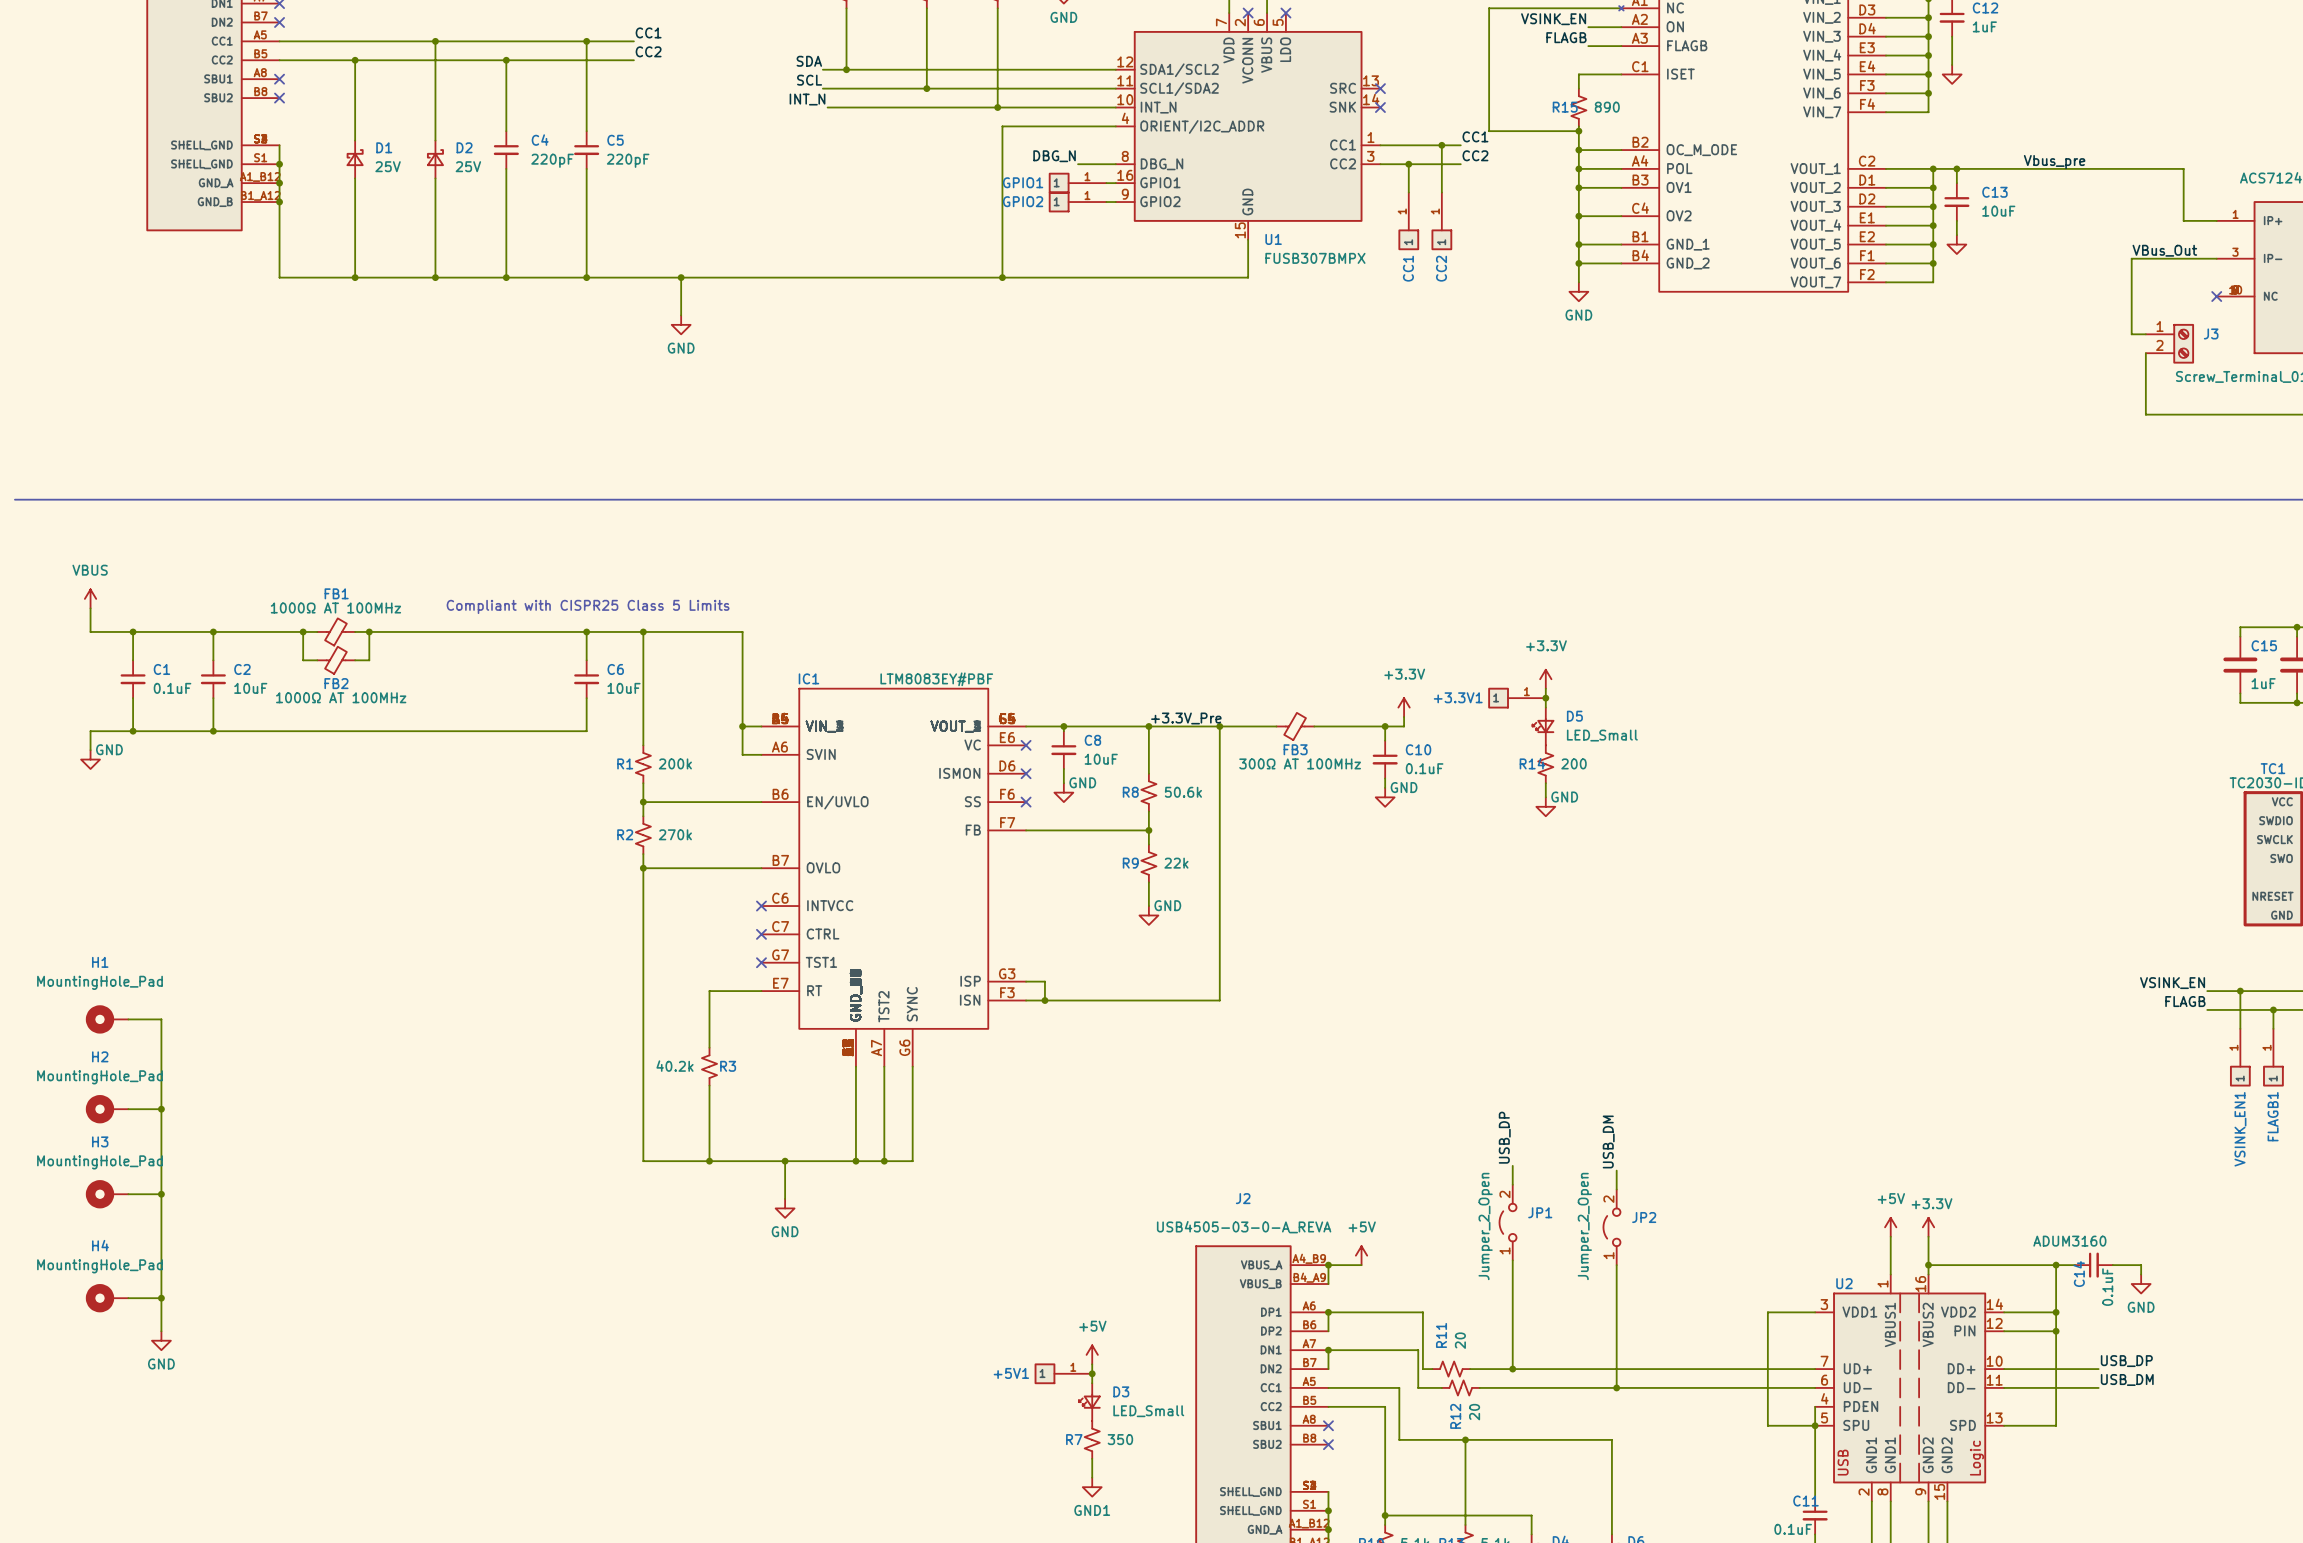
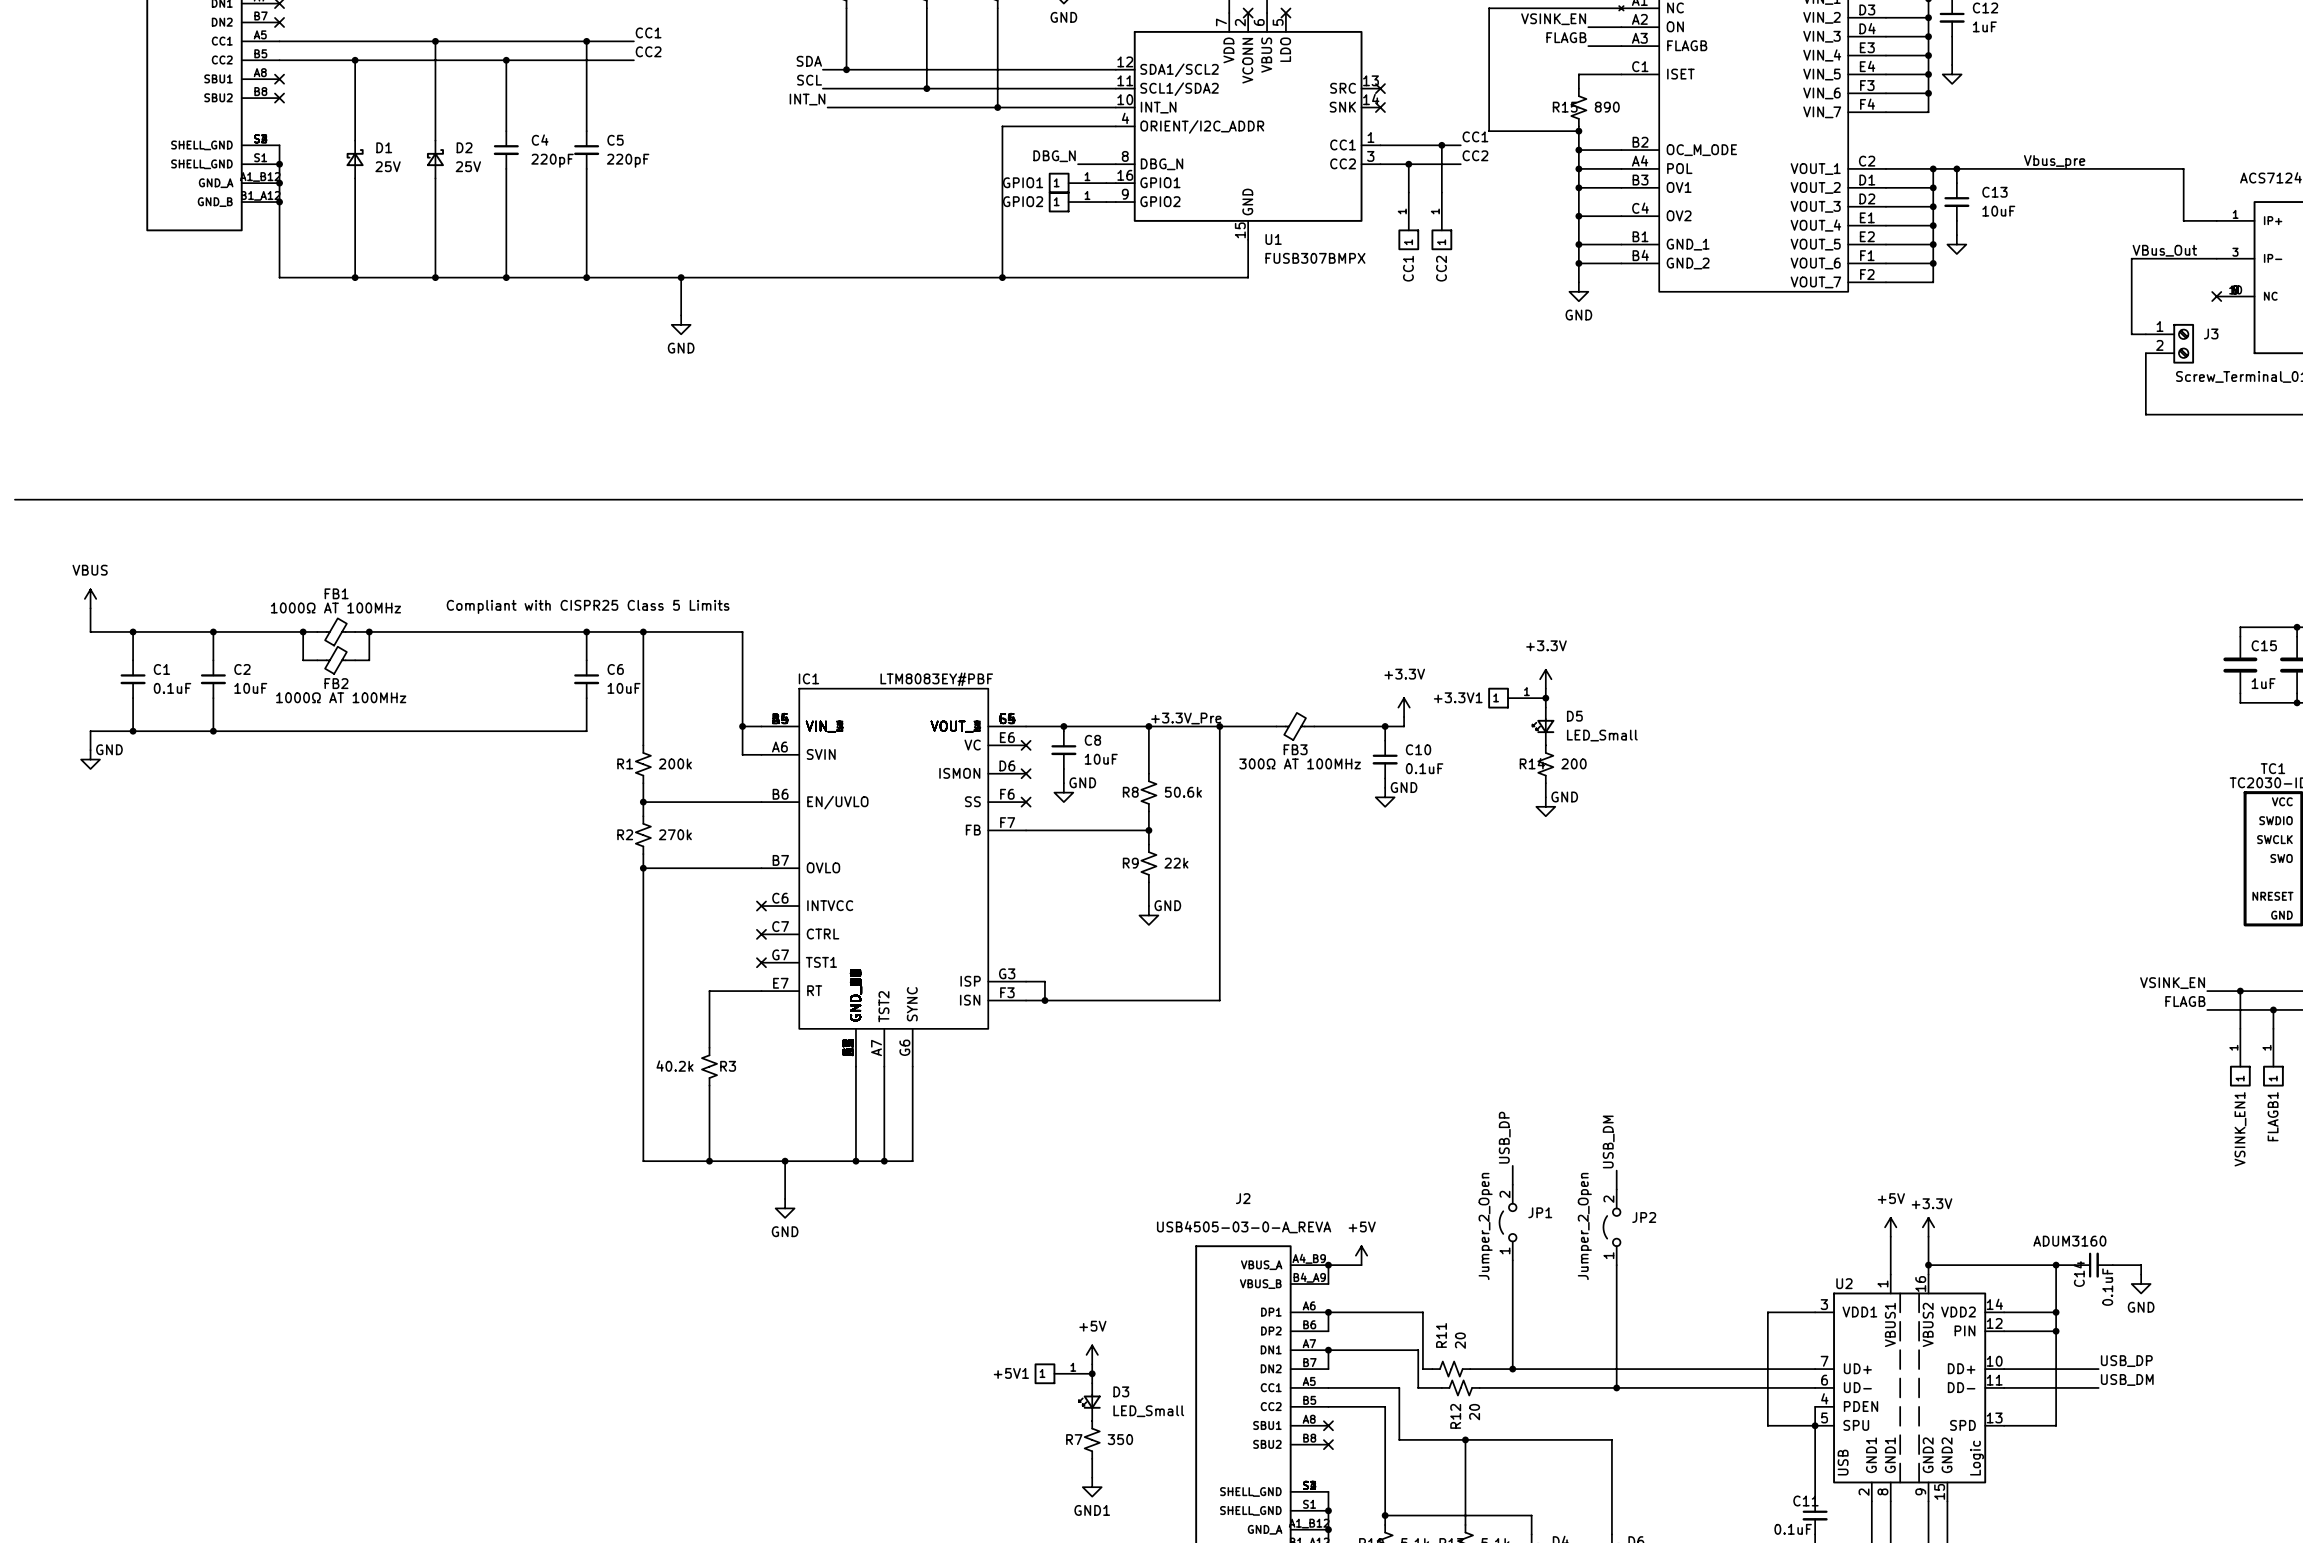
H1: MountingHole_Pad (107, 1019) -> none
wire: (128, 1019) (161, 1019) (161, 1331) -> none
H2: MountingHole_Pad (107, 1109) -> none
wire: (128, 1109) (161, 1109) -> none
junction: (161, 1109) -> none
H3: MountingHole_Pad (107, 1194) -> none
wire: (128, 1194) (161, 1194) -> none
junction: (161, 1194) -> none
H4: MountingHole_Pad (107, 1298) -> none
wire: (128, 1298) (161, 1298) -> none
junction: (161, 1298) -> none
power symbol: GND (161, 1340) -> none

